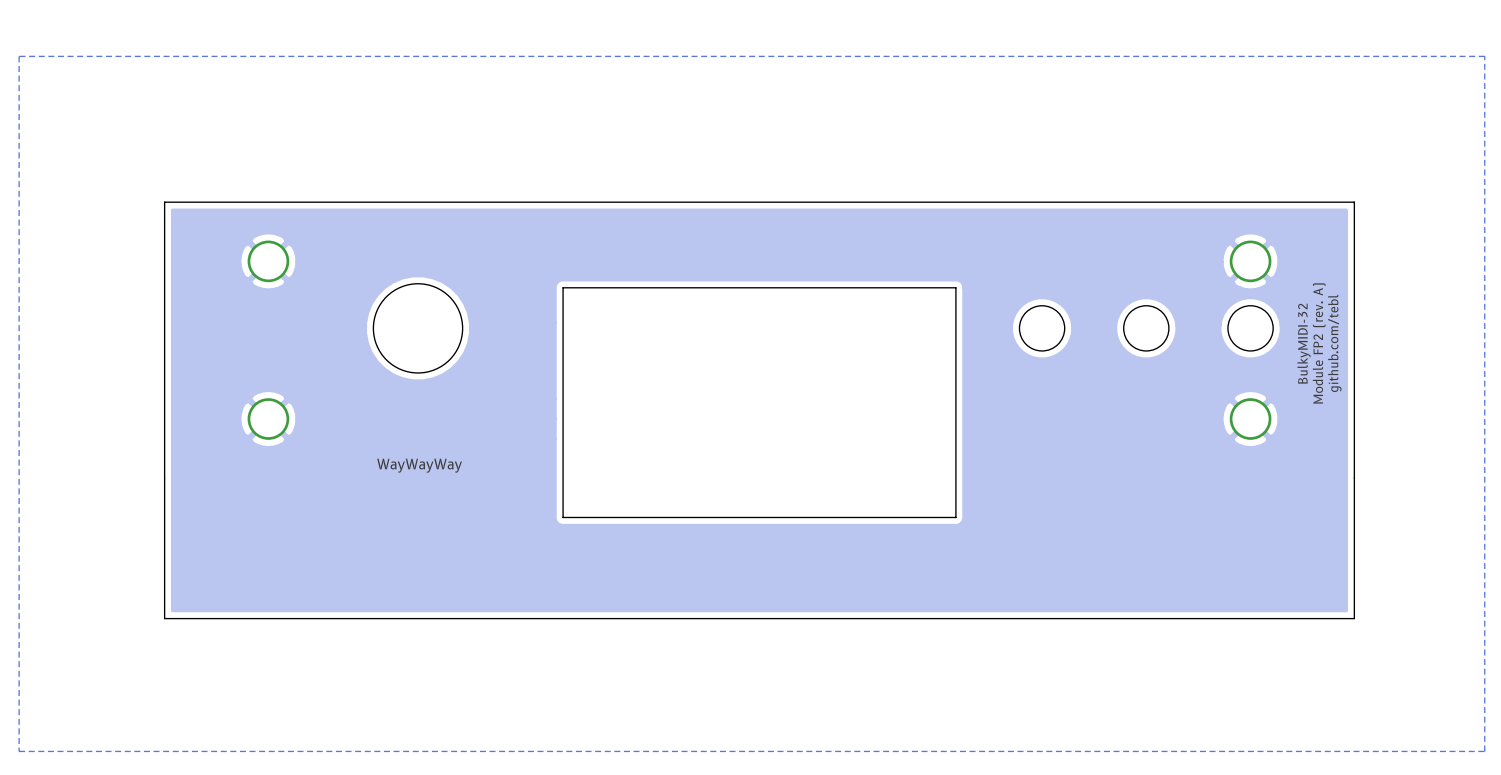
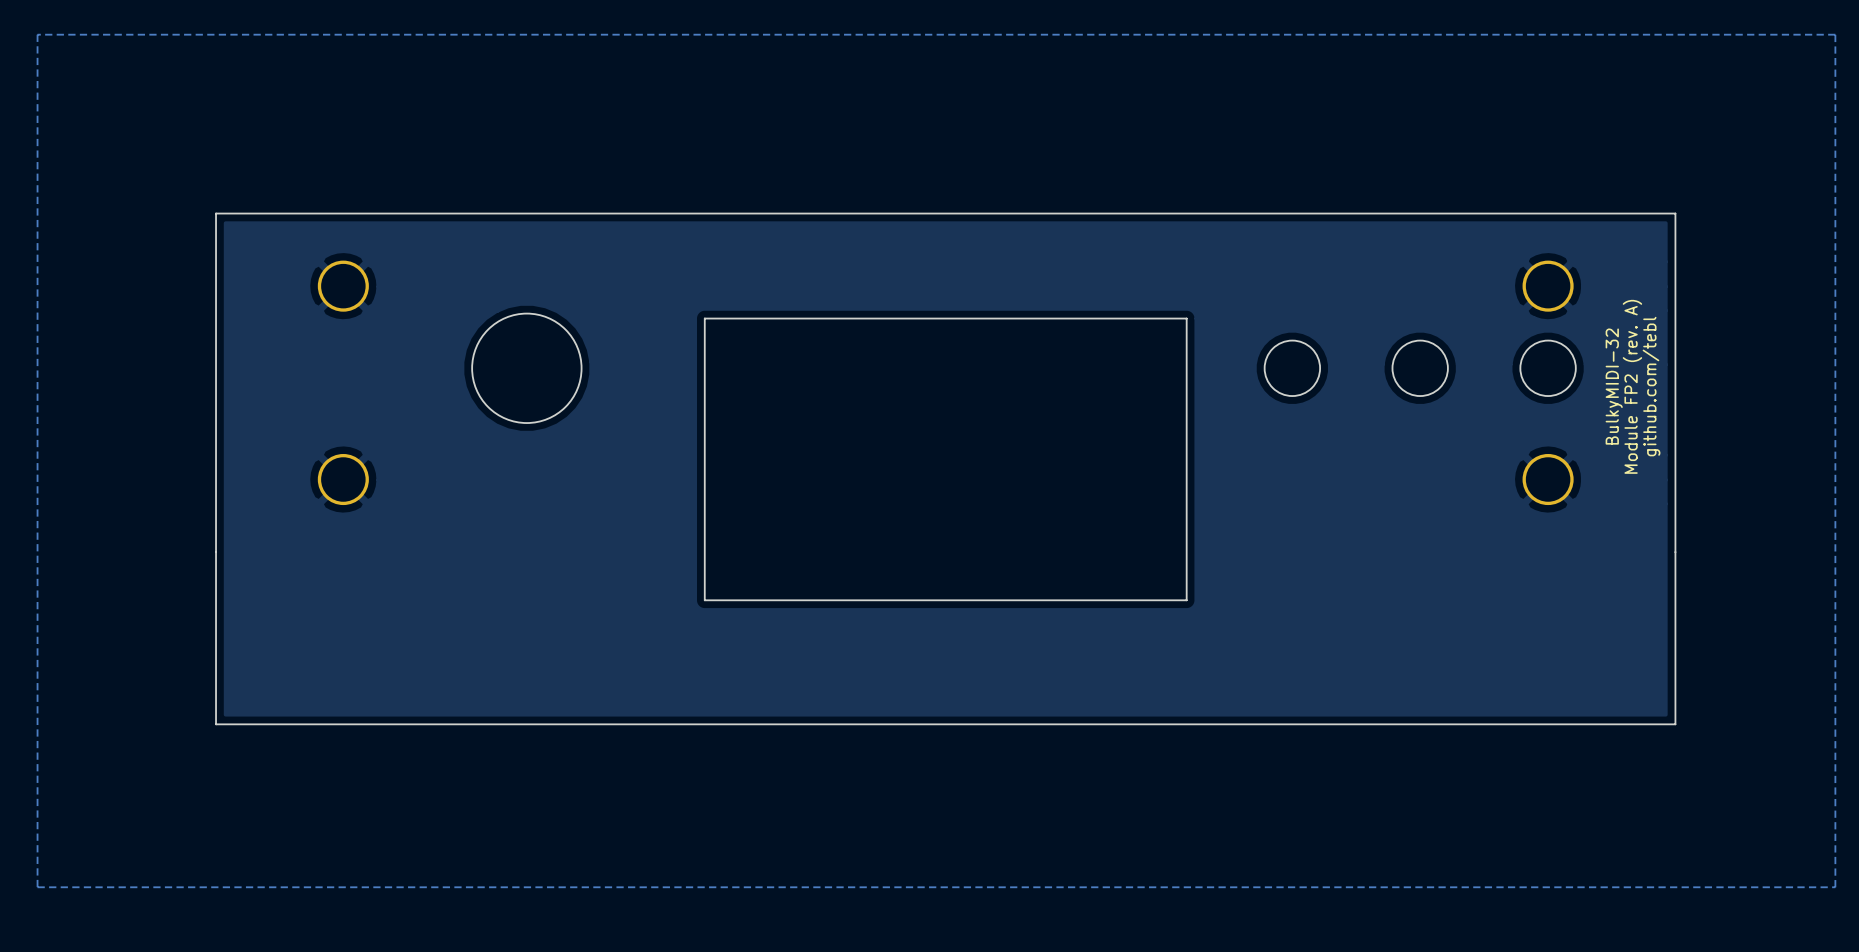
text: WayWayWay (419, 465) -> none

